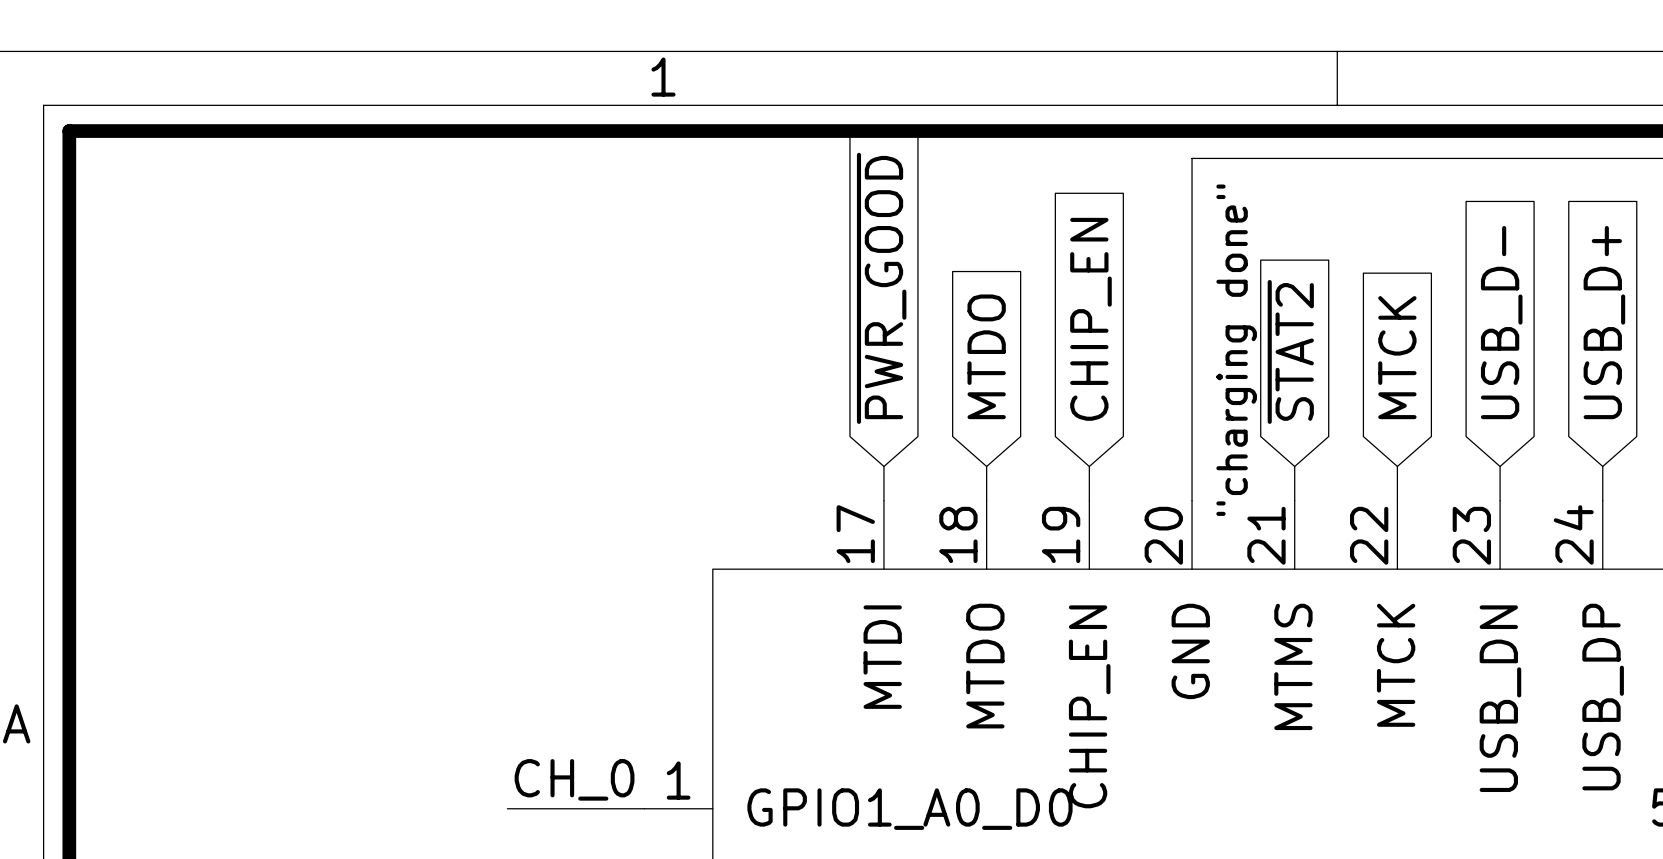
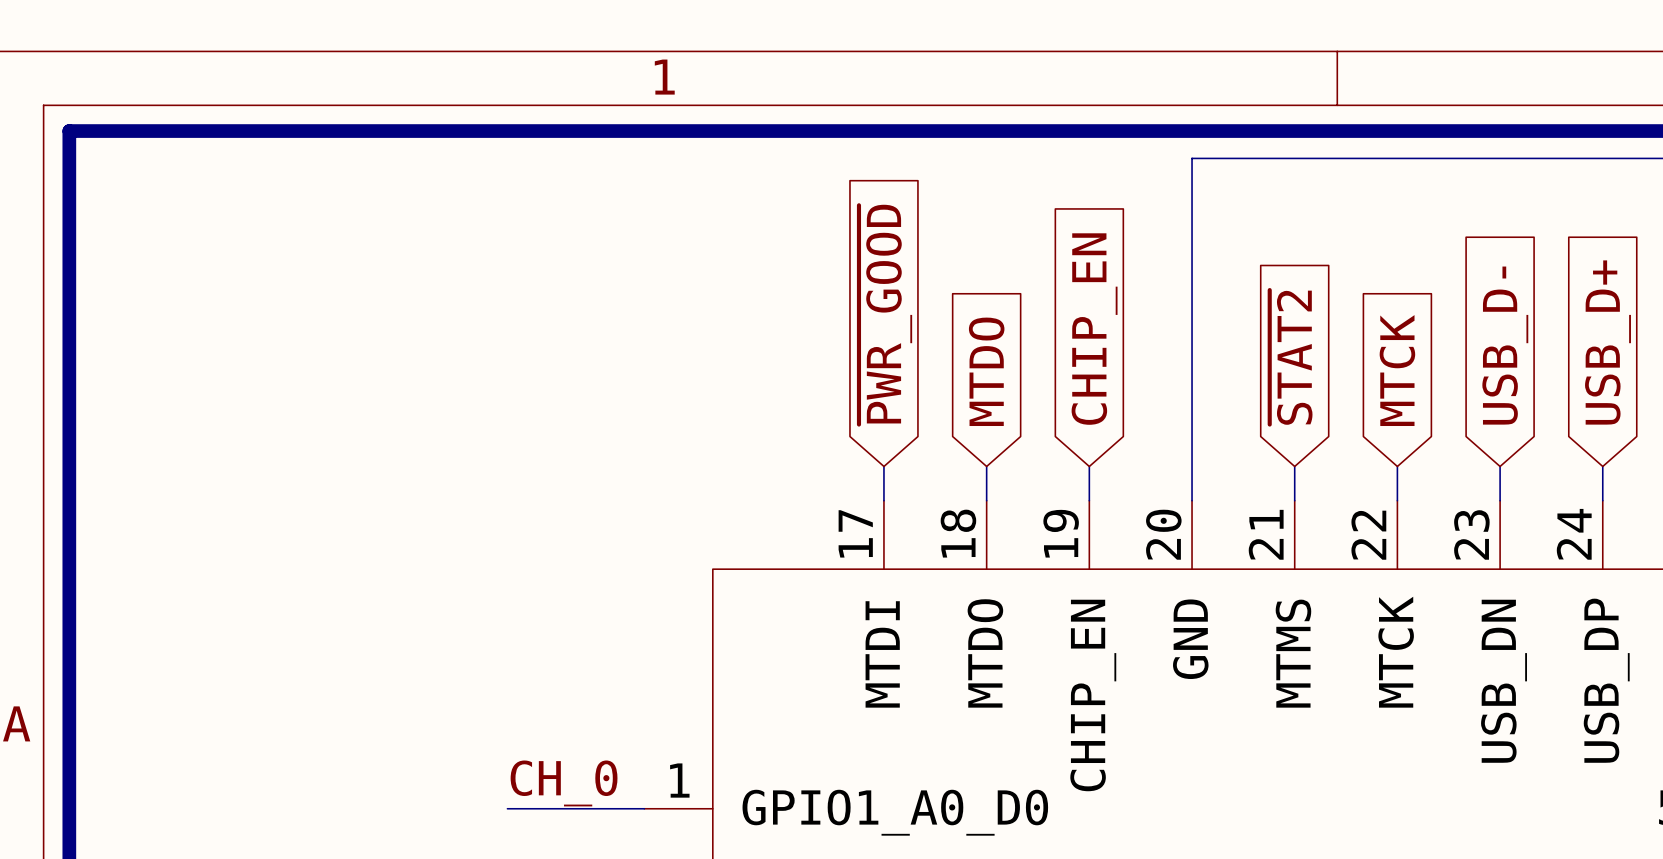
text: "charging done" (1236, 350) -> none

